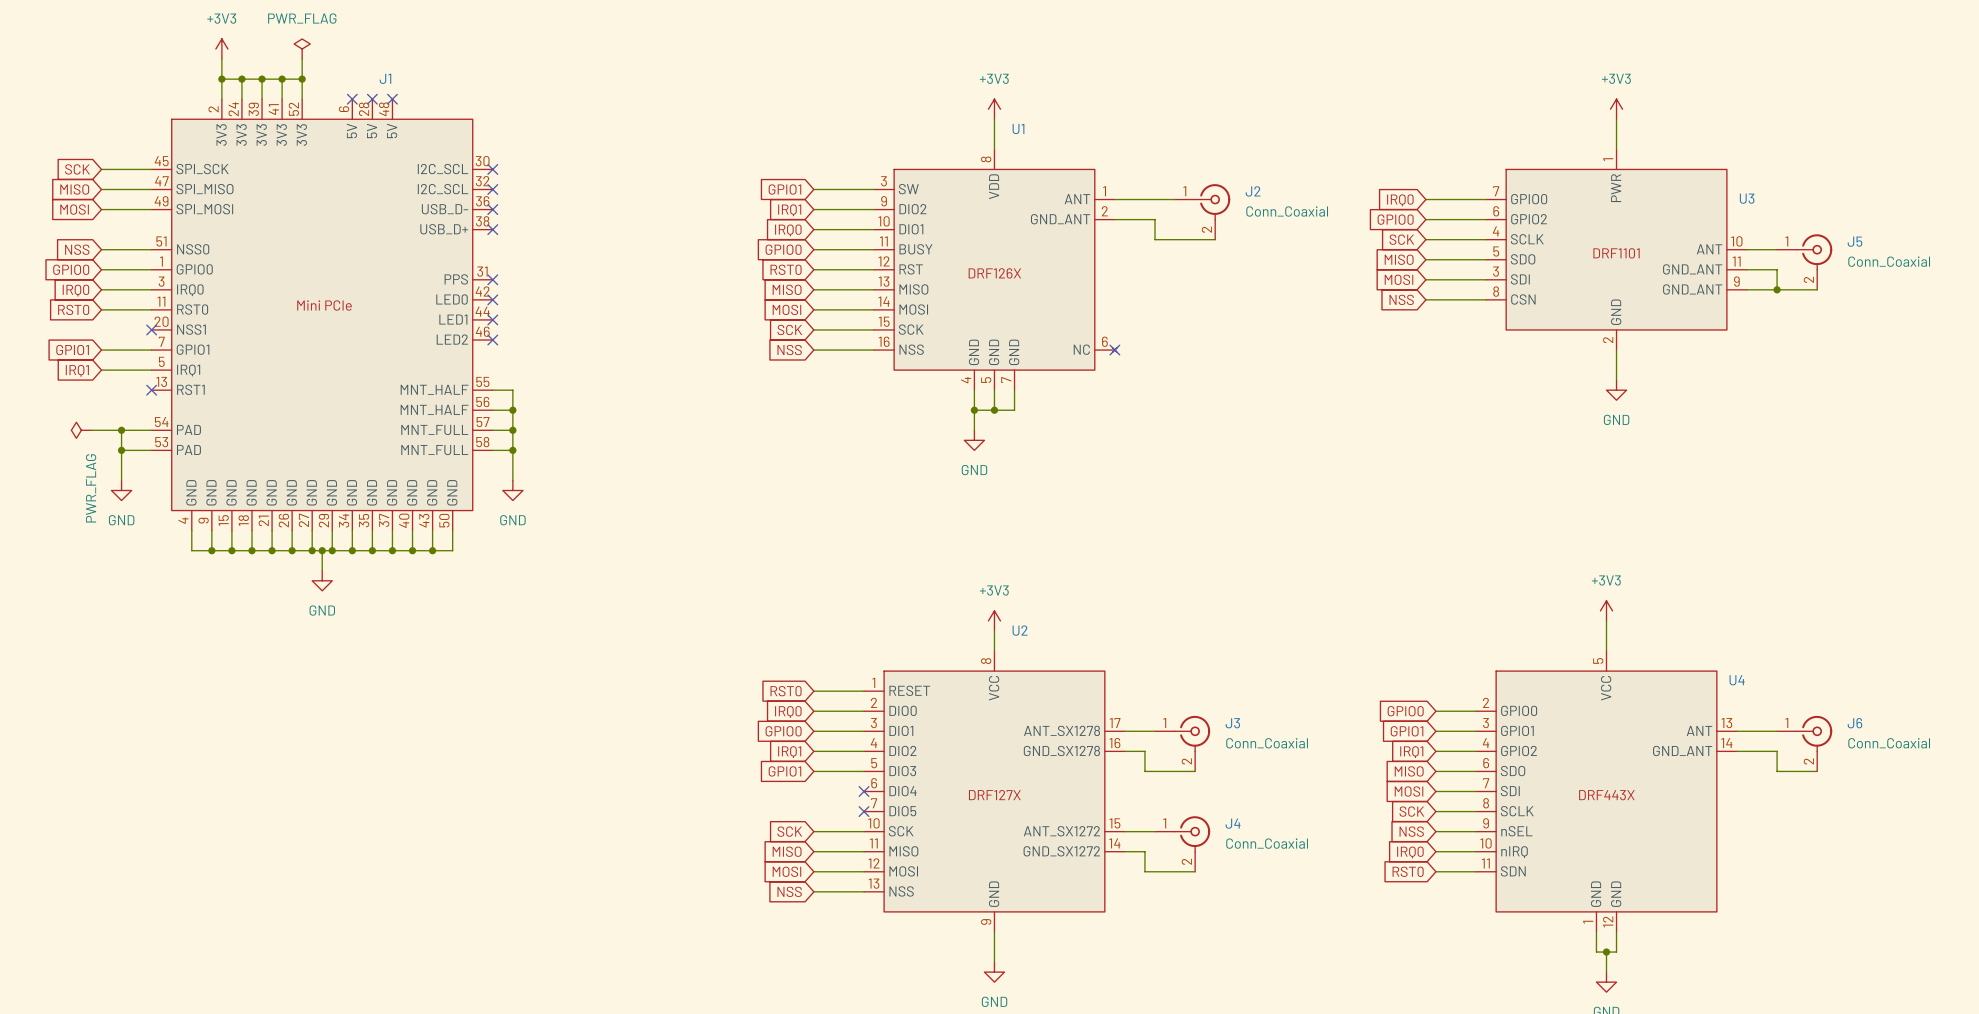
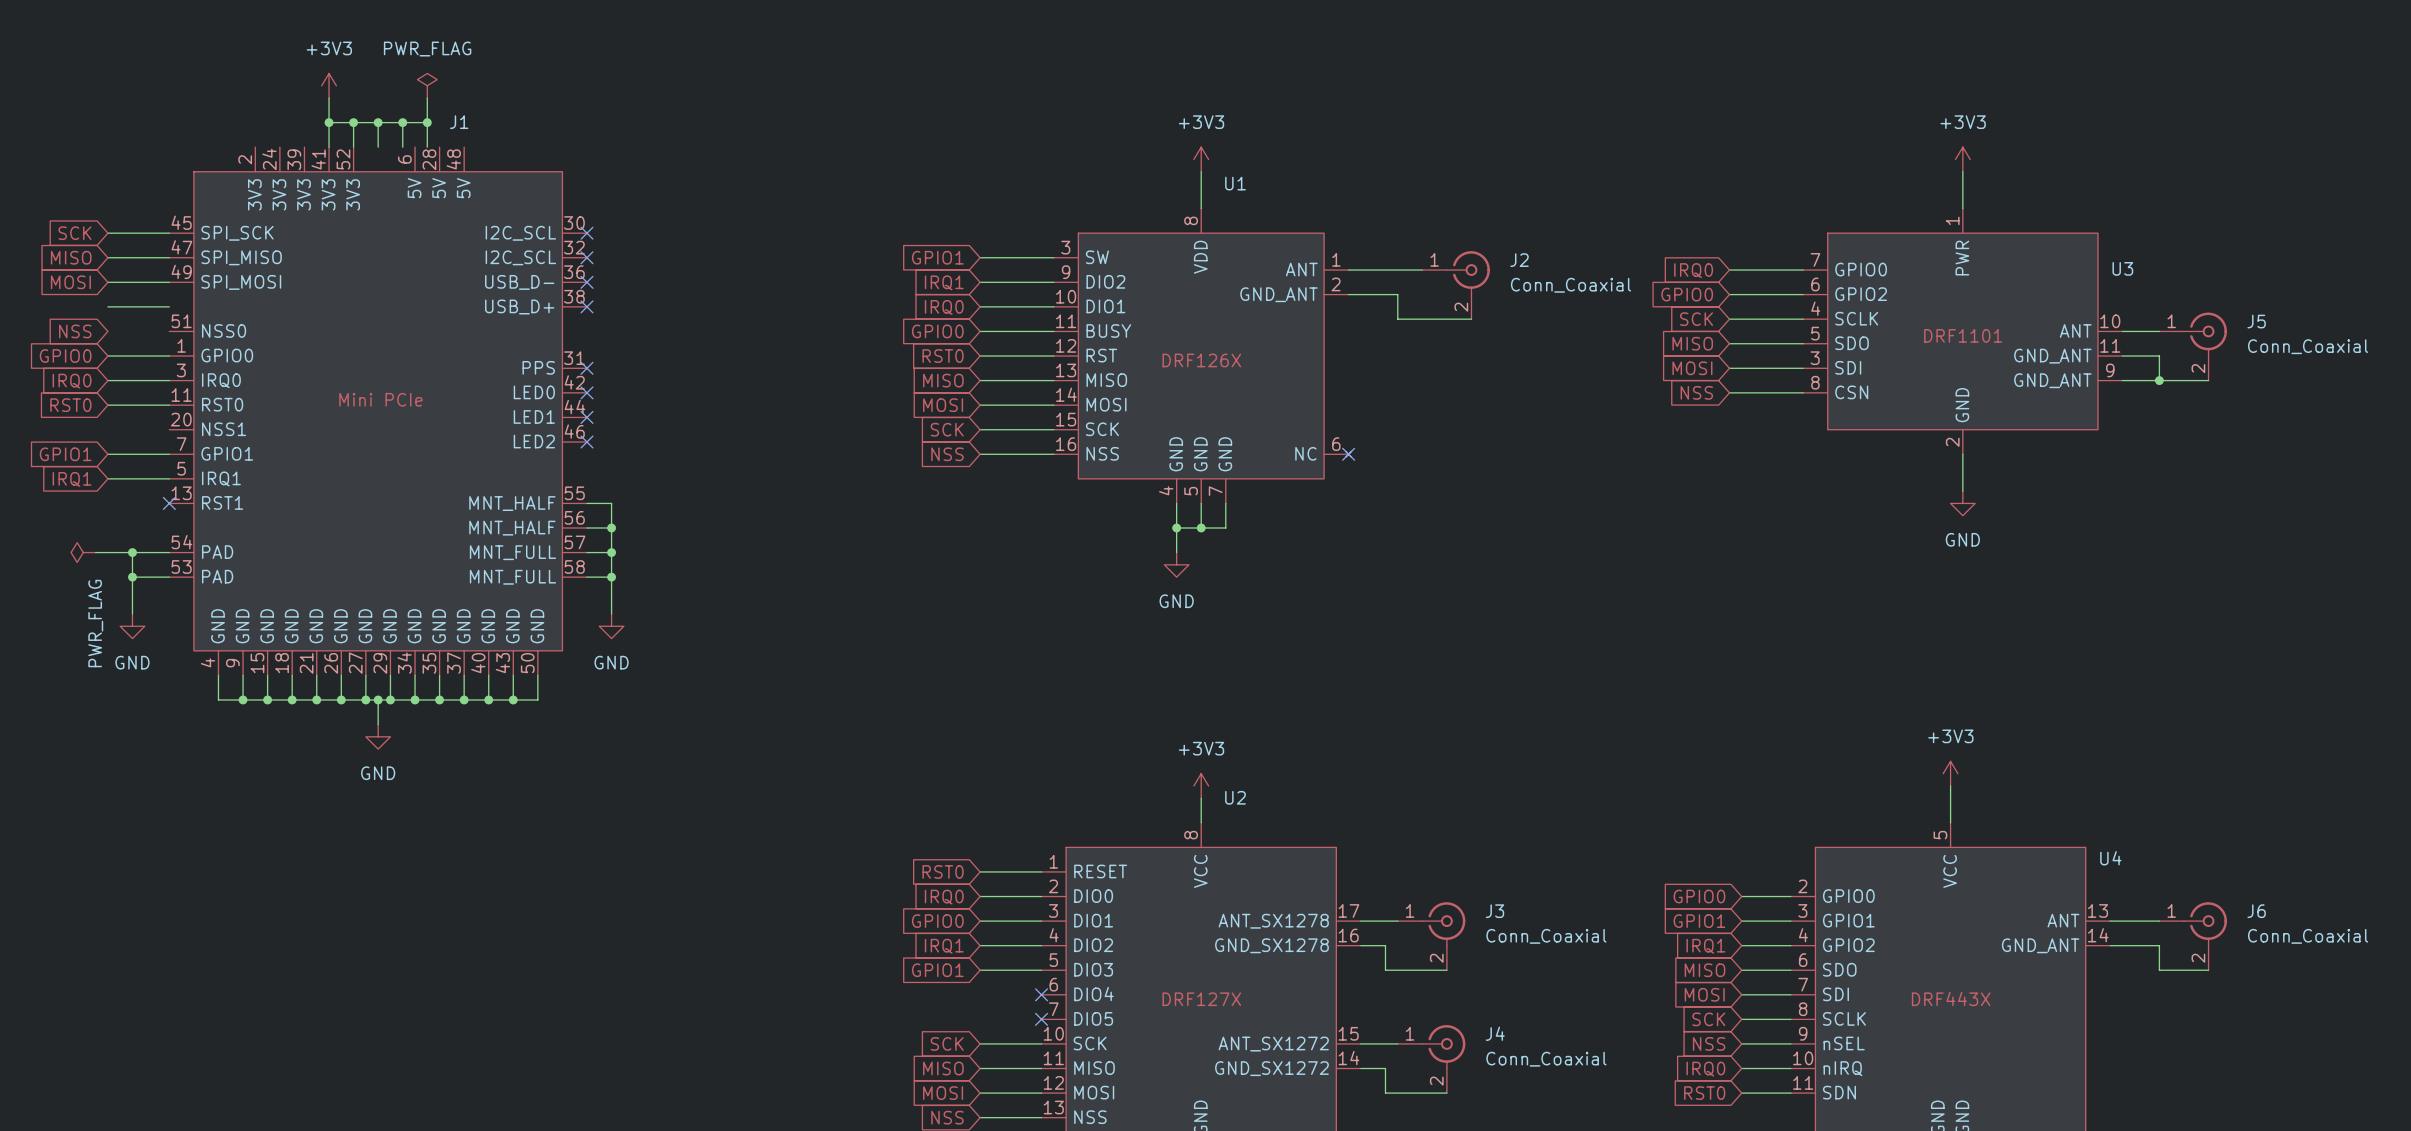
power symbol position: +3V3 (221, 49) -> +3V3 (329, 85)
power symbol position: PWR_FLAG (302, 49) -> PWR_FLAG (427, 85)
wire: (221, 59) (221, 99) -> (427, 98) (427, 147)
wire: (302, 59) (302, 79) -> (427, 122) (353, 122)
wire: (221, 79) (282, 79) -> (329, 98) (329, 122)
junction: (221, 79) -> none
wire: (241, 79) (241, 99) -> (378, 122) (378, 147)
junction: (241, 79) -> none
wire: (262, 79) (262, 99) -> (402, 122) (402, 147)
junction: (262, 79) -> none
junction: none -> (378, 122)
junction: none -> (402, 122)
junction: none -> (427, 122)
no-connect mark: (352, 99) -> none
no-connect mark: (372, 99) -> none
no-connect mark: (392, 99) -> none
wire: (101, 249) (151, 249) -> (107, 306) (169, 306)
no-connect mark: (151, 329) -> none

